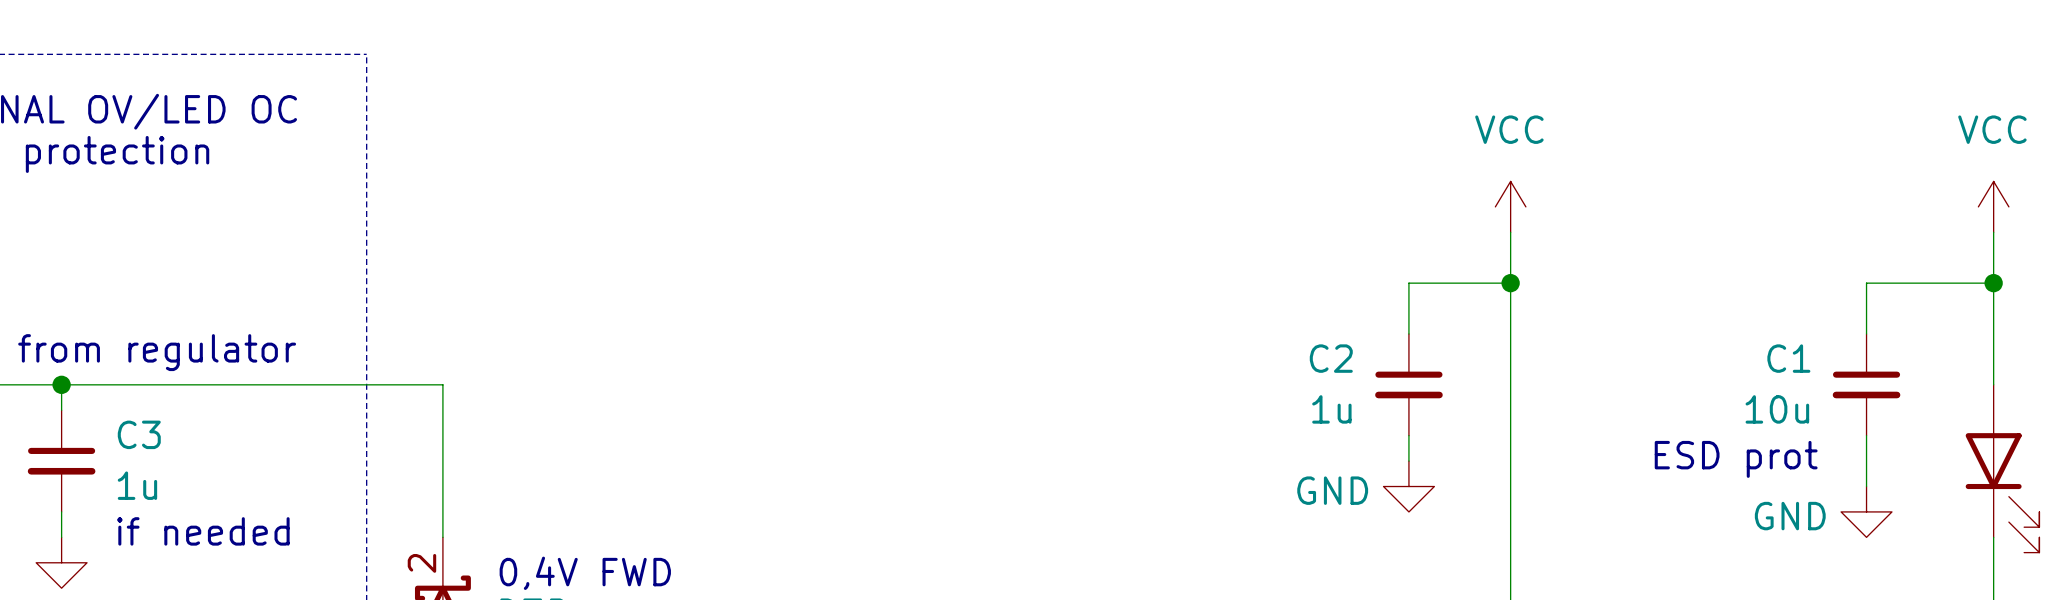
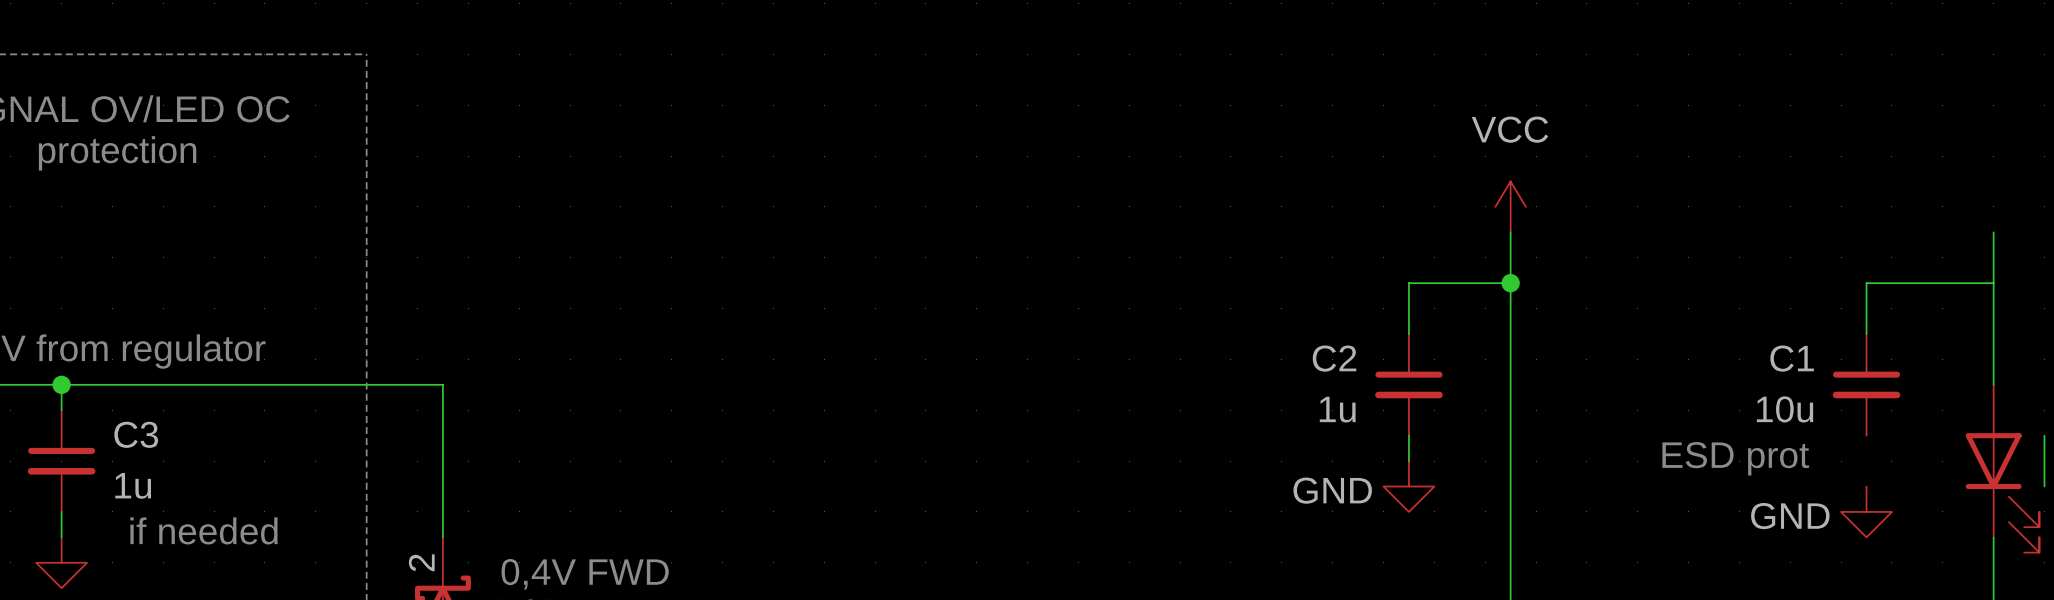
power symbol: VCC (1993, 206) -> none
junction: (1993, 283) -> none
wire: (1866, 435) (1866, 486) -> (2044, 435) (2044, 486)

